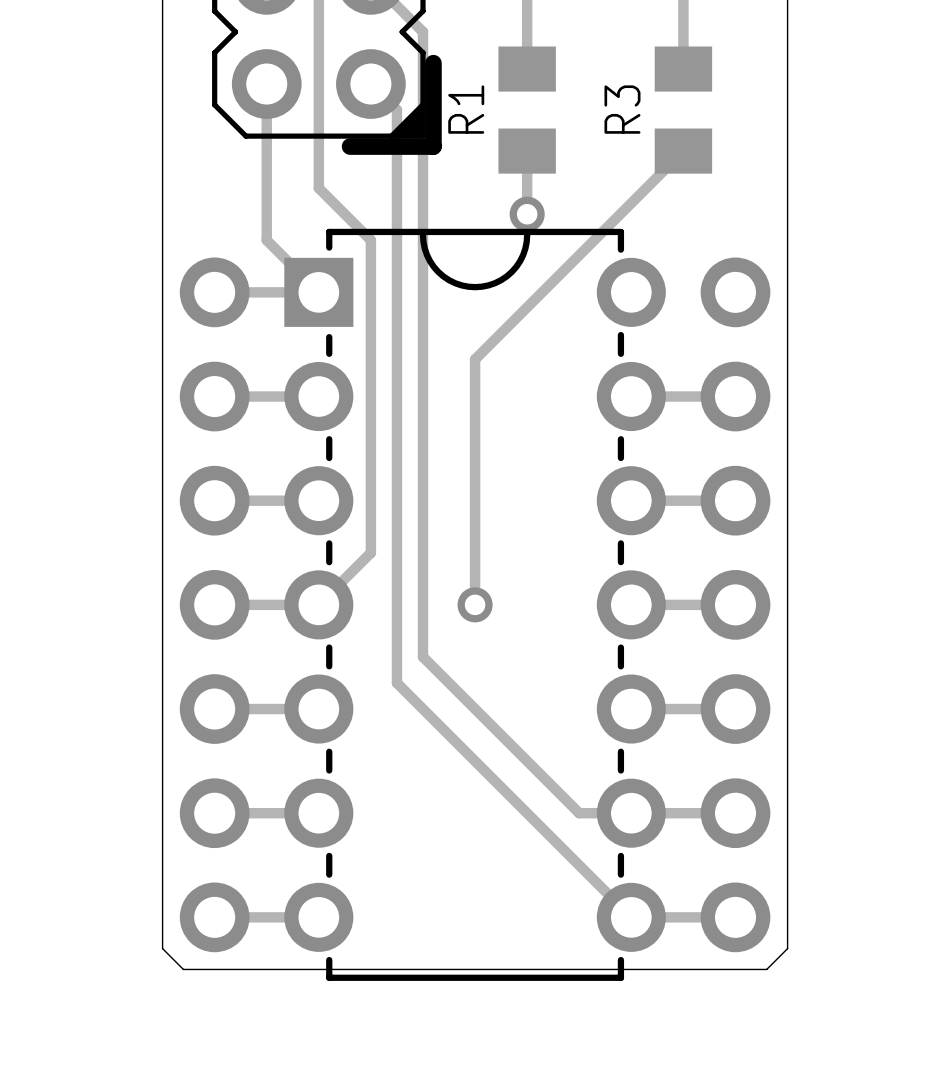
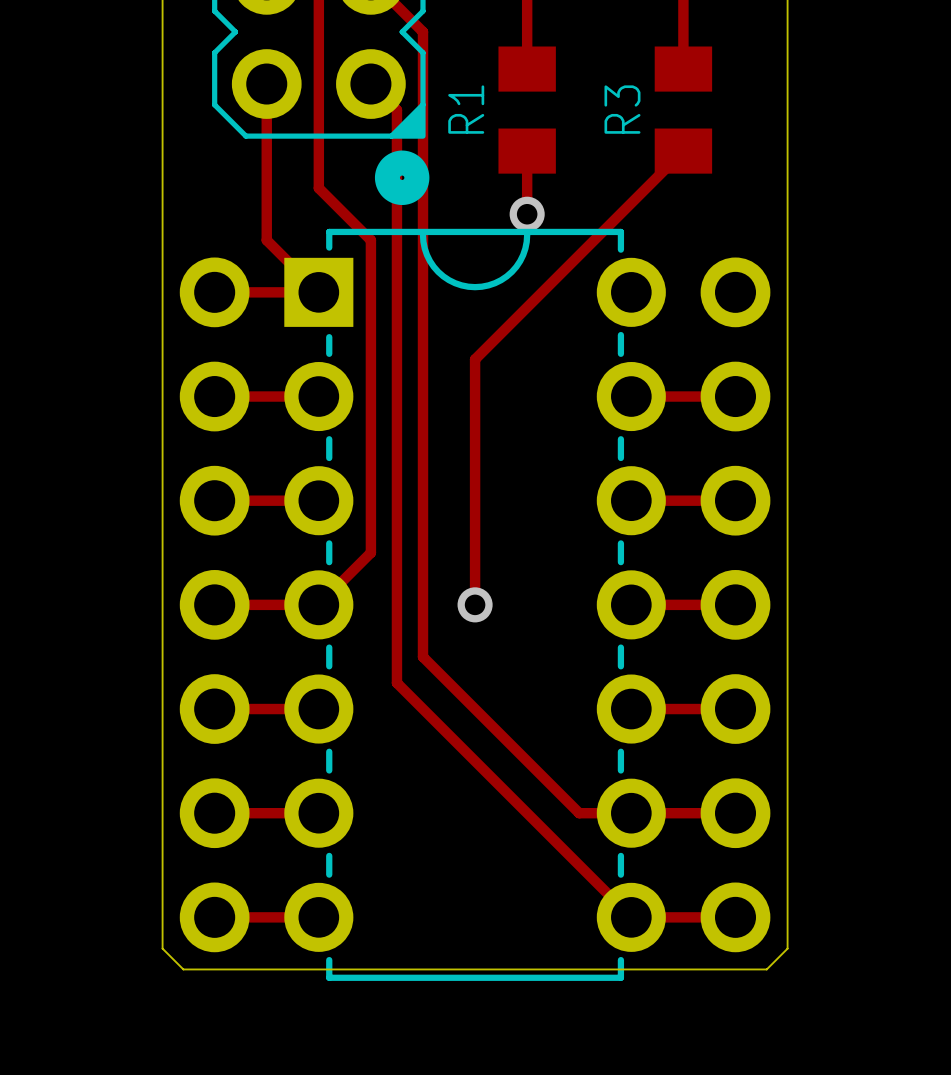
line: (433, 63) (433, 146) (350, 146) -> none
drawing: none -> [374, 150, 430, 206]

